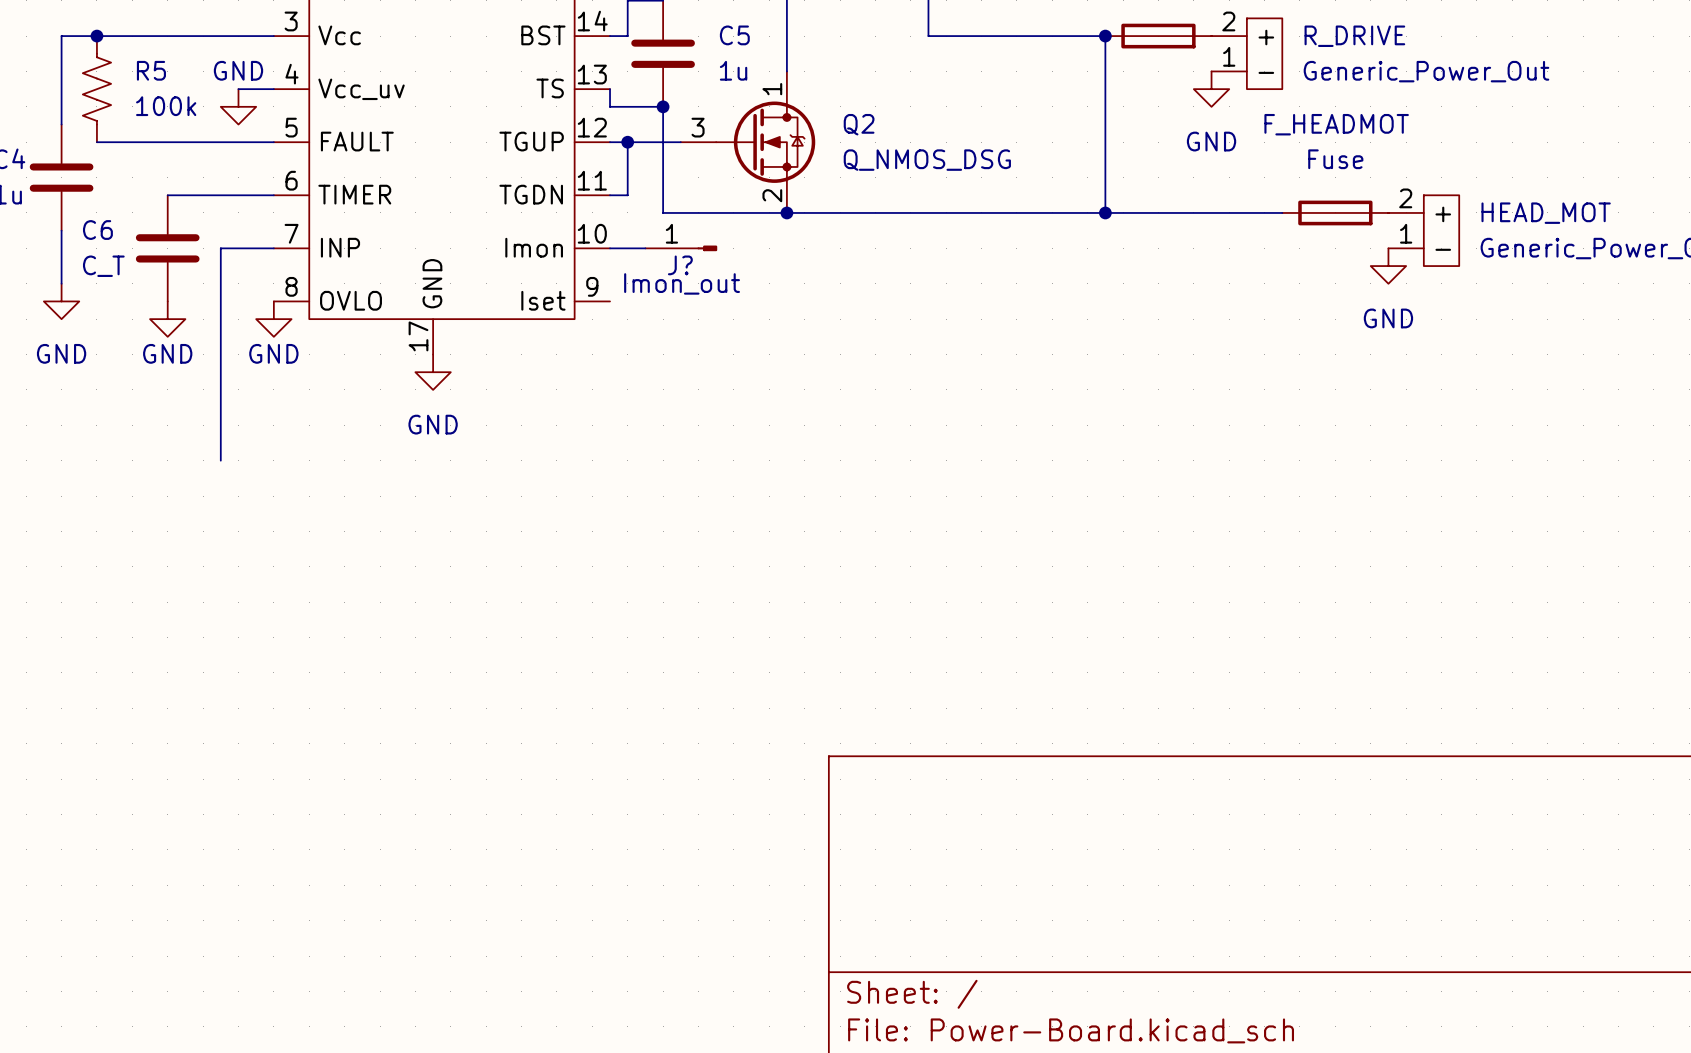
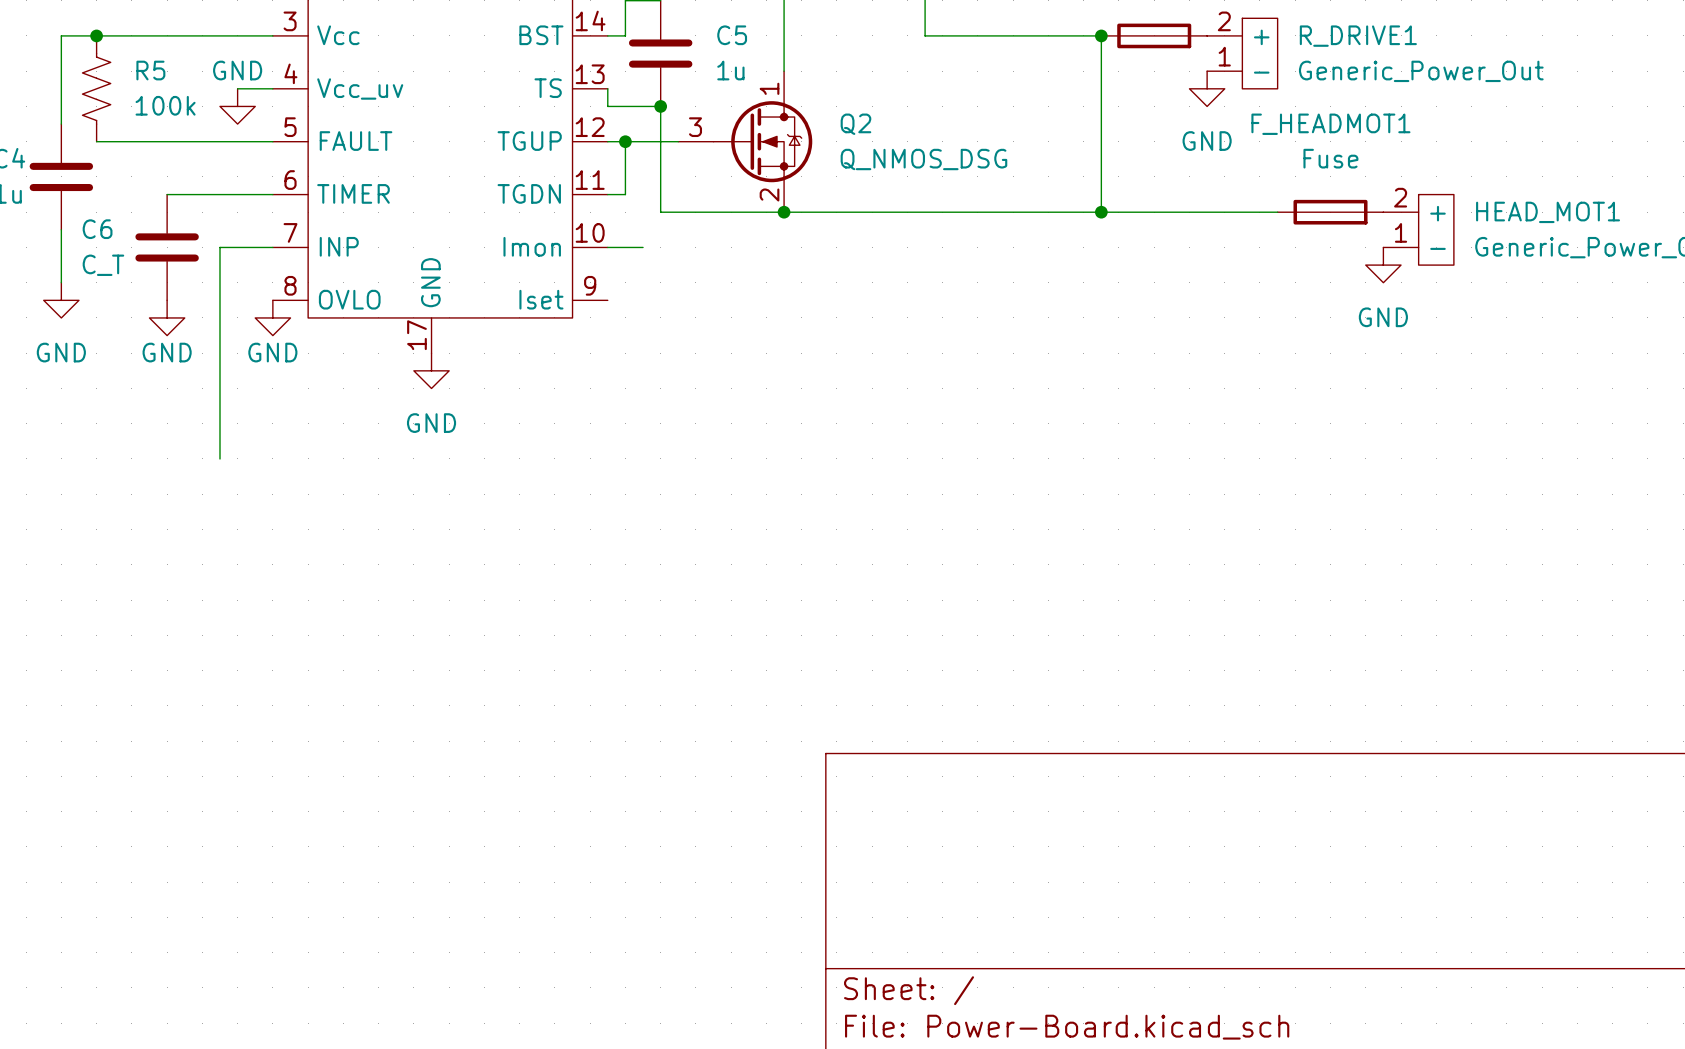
R_DRIVE name: R_DRIVE (1354, 36) -> R_DRIVE1 (1358, 36)
F_HEADMOT name: F_HEADMOT (1336, 124) -> F_HEADMOT1 (1330, 124)
HEAD_MOT name: HEAD_MOT (1546, 213) -> HEAD_MOT1 (1548, 212)
J?: Imon_out (681, 248) -> none

